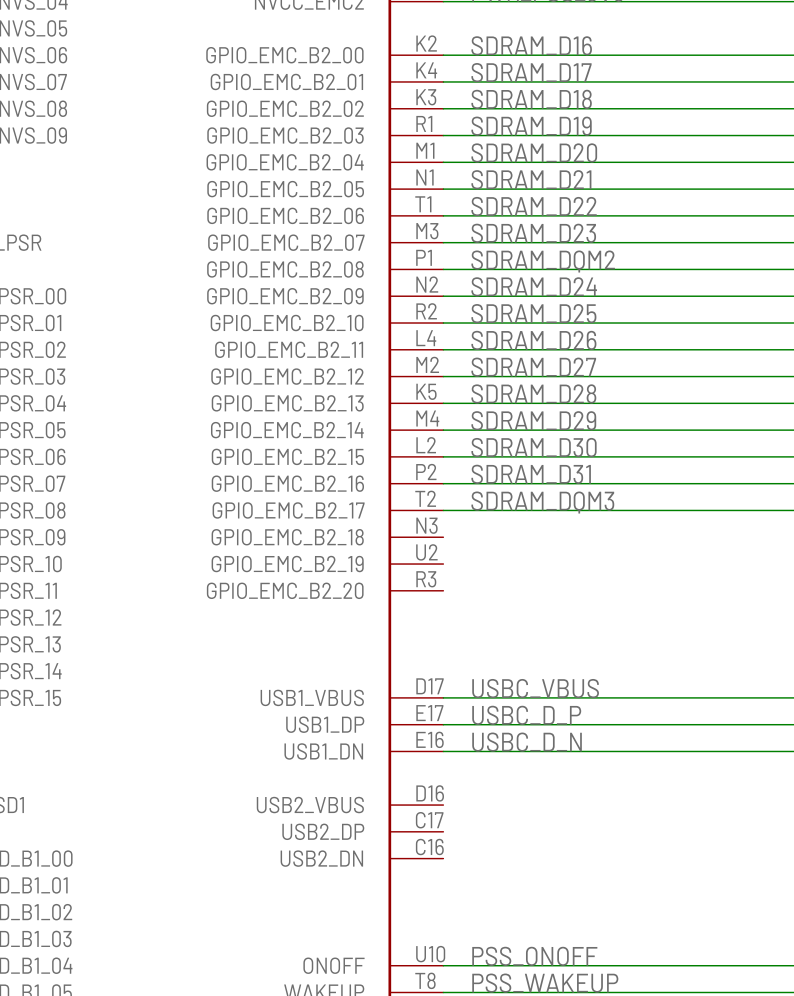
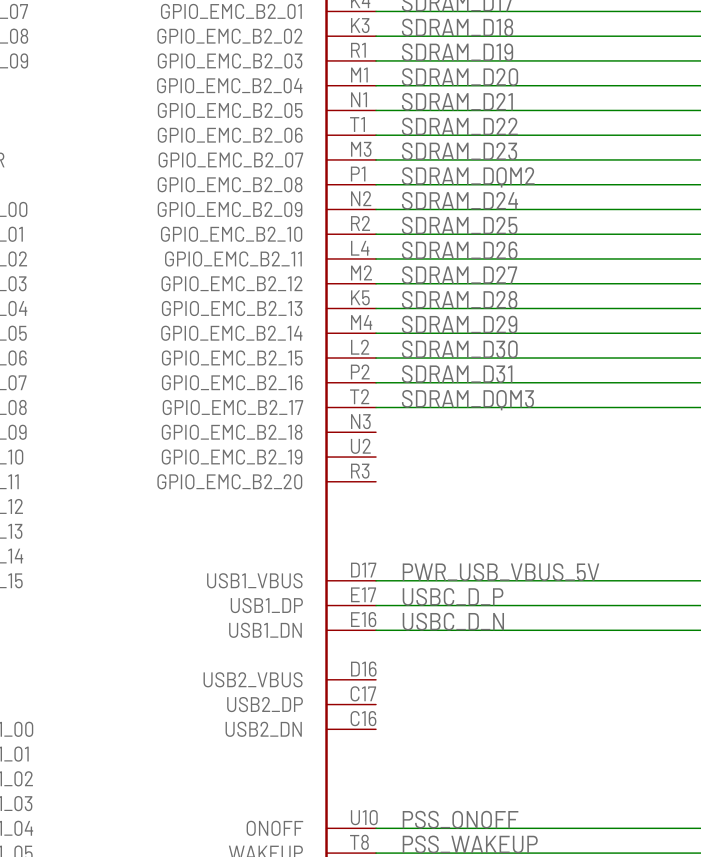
label: USBC_VBUS (535, 688) -> PWR_USB_VBUS_5V (501, 572)

